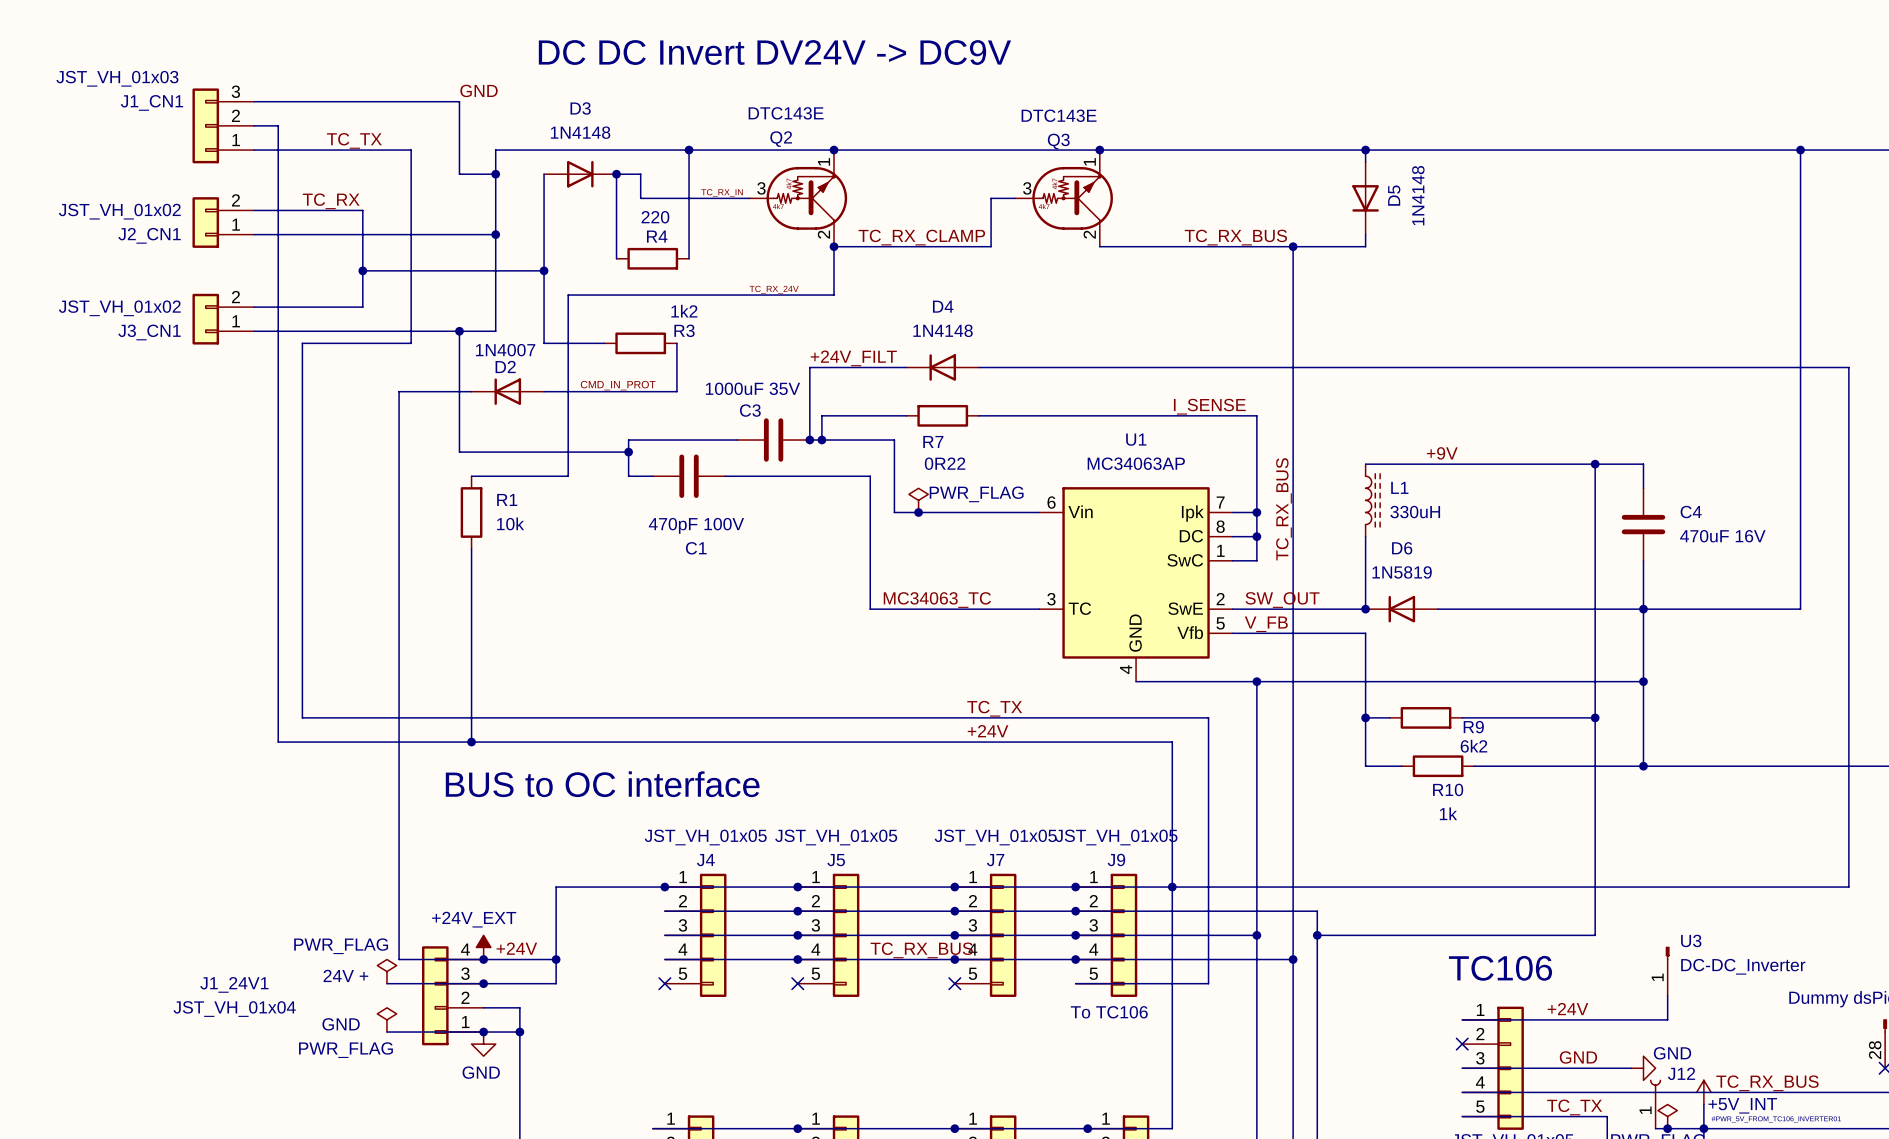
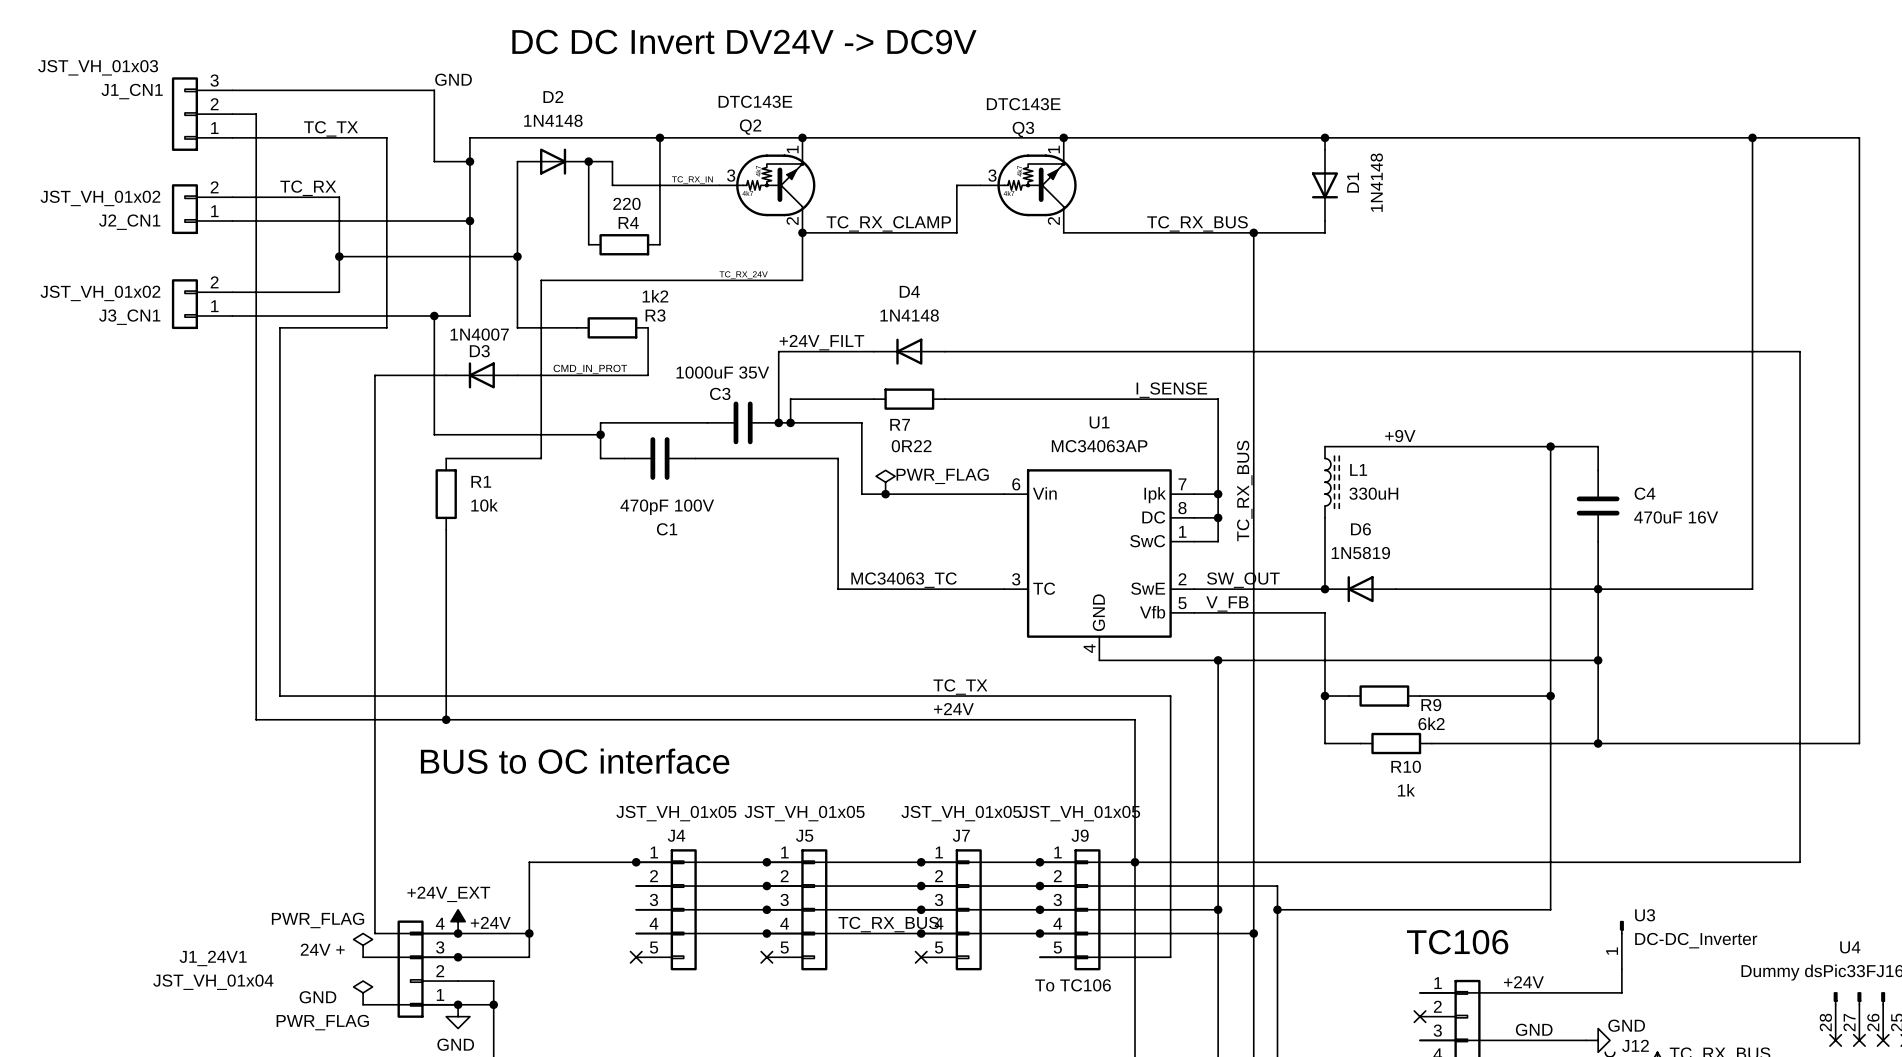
D3 name: D3 (580, 108) -> D2 (553, 96)
D5 name: D5 (1394, 195) -> D1 (1353, 182)
D2 name: D2 (505, 366) -> D3 (479, 351)

